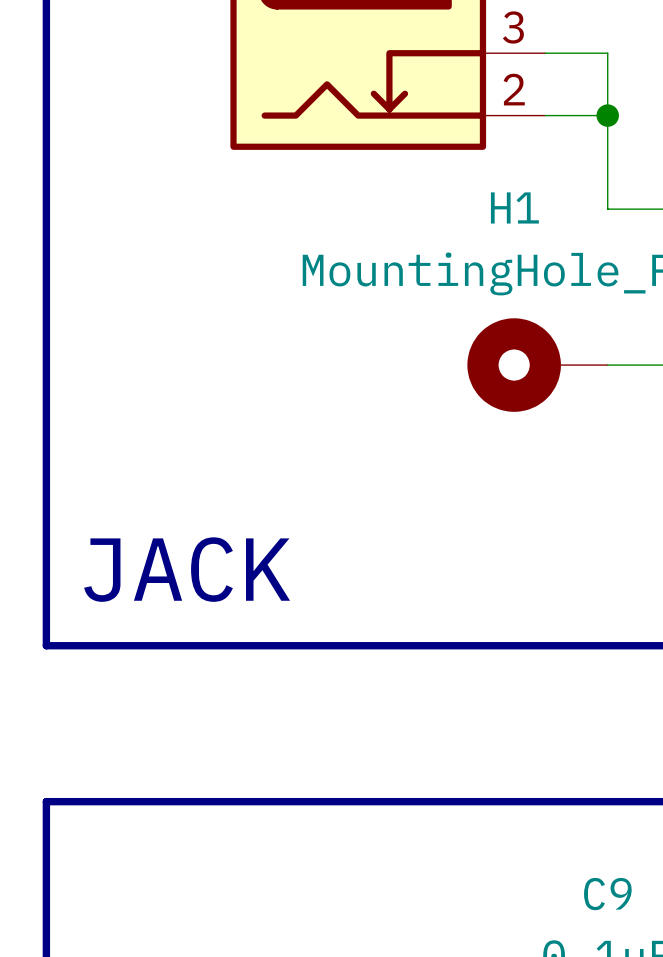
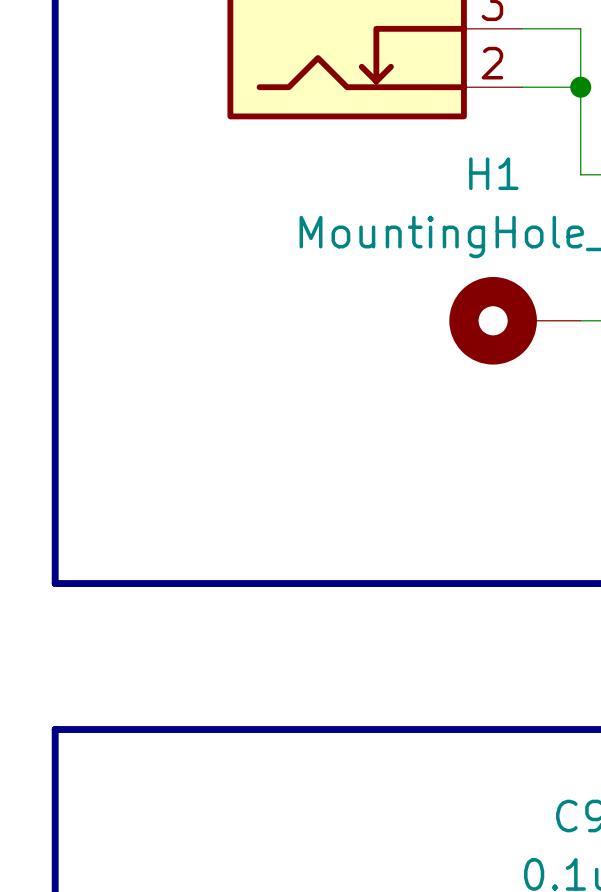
text: JACK (187, 569) -> none

